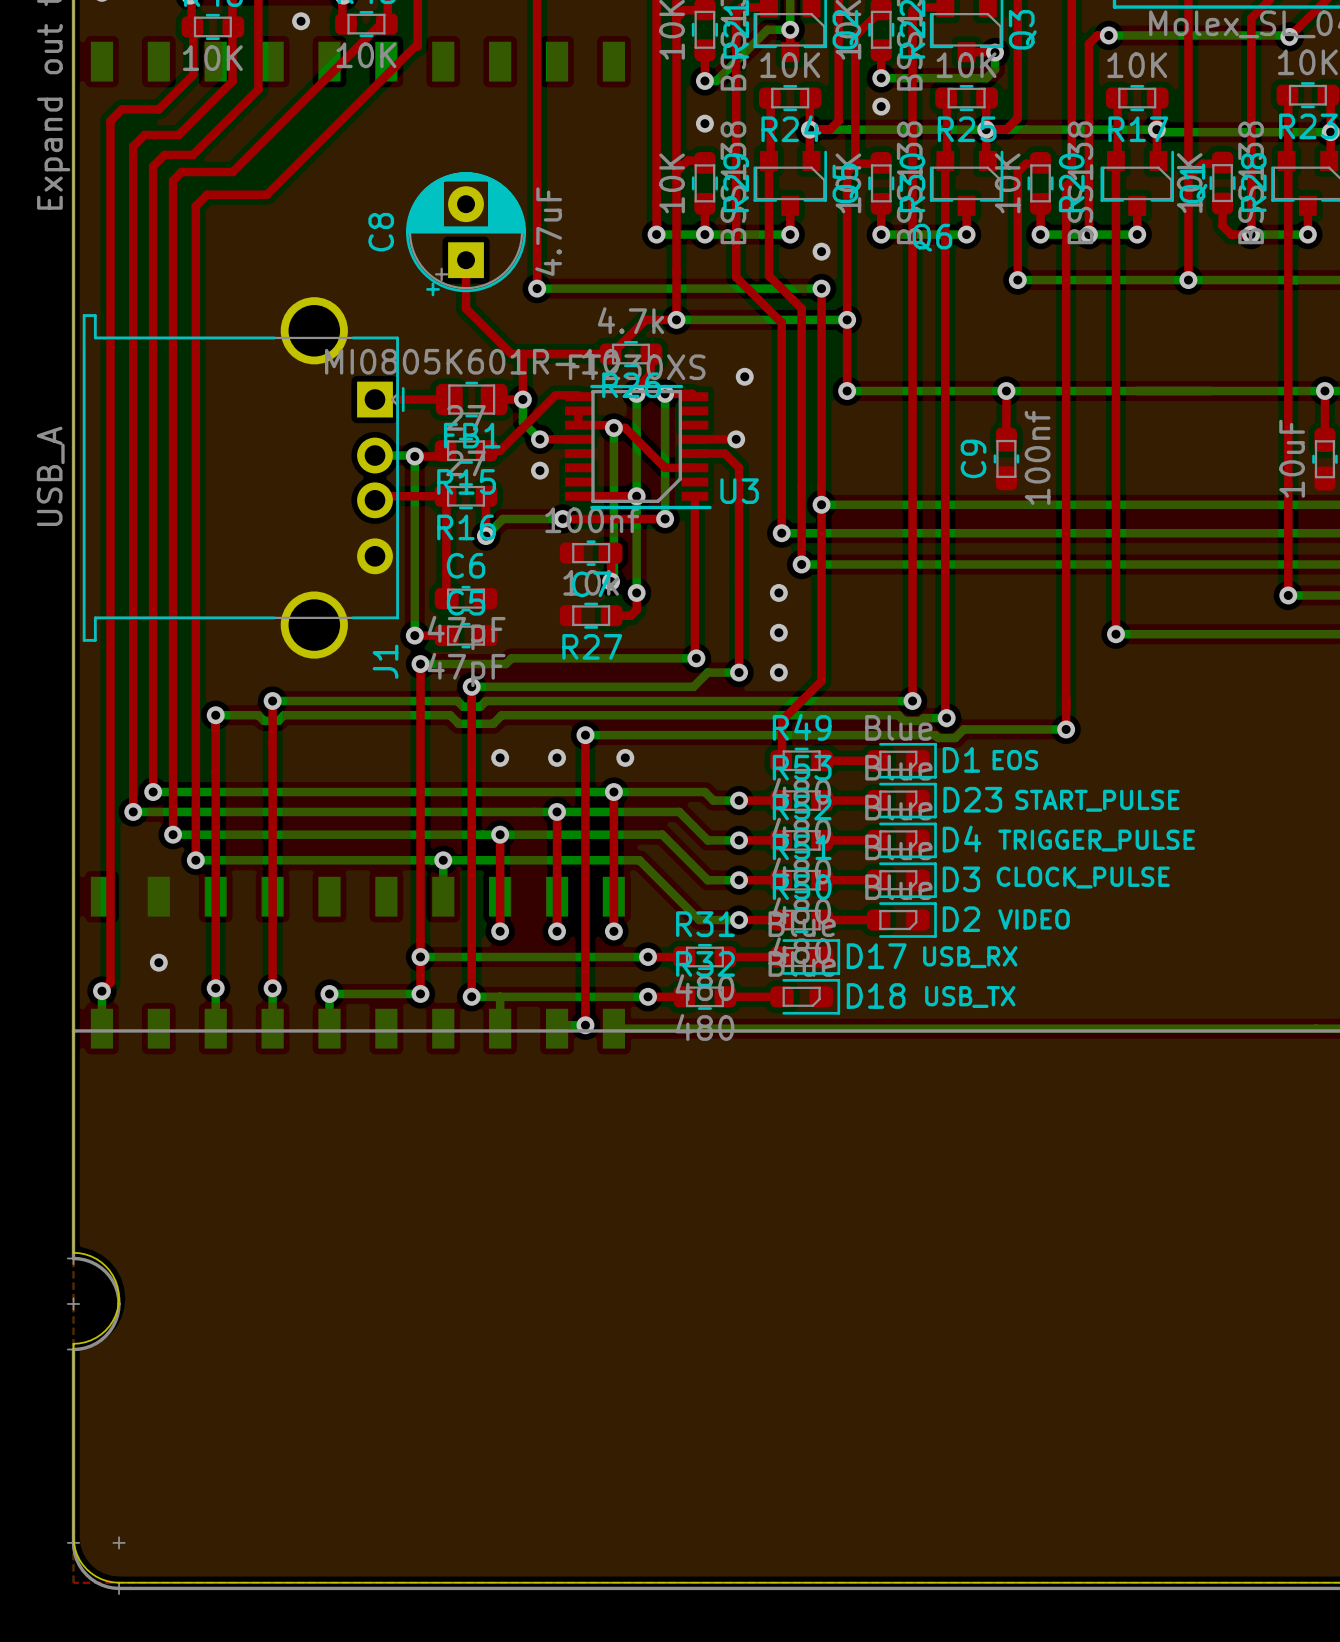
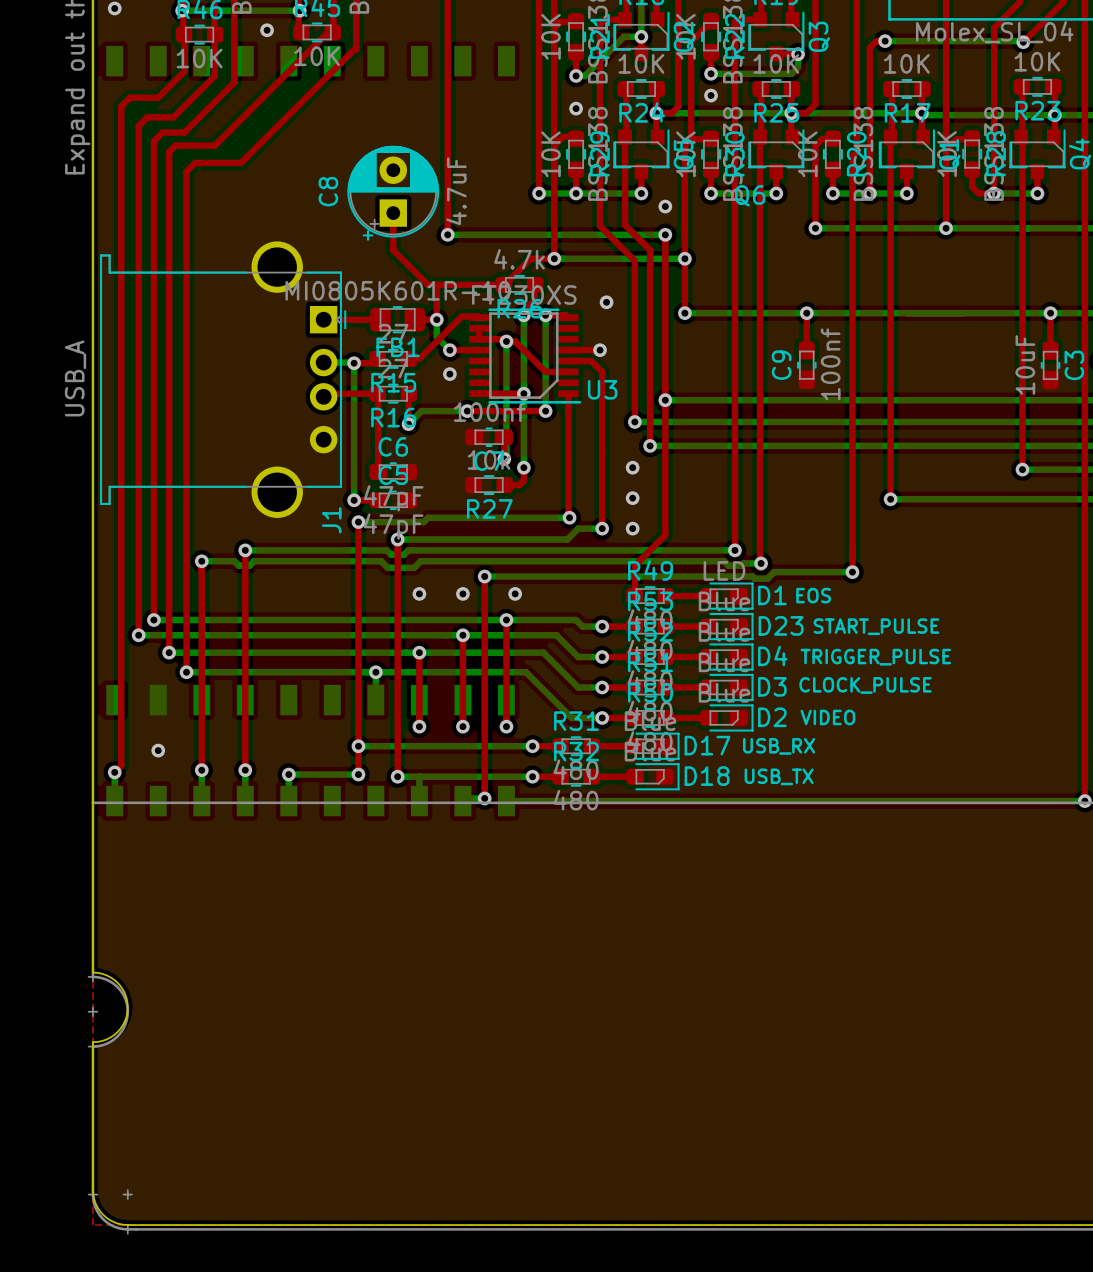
D1 value: Blue (898, 727) -> LED (724, 570)

